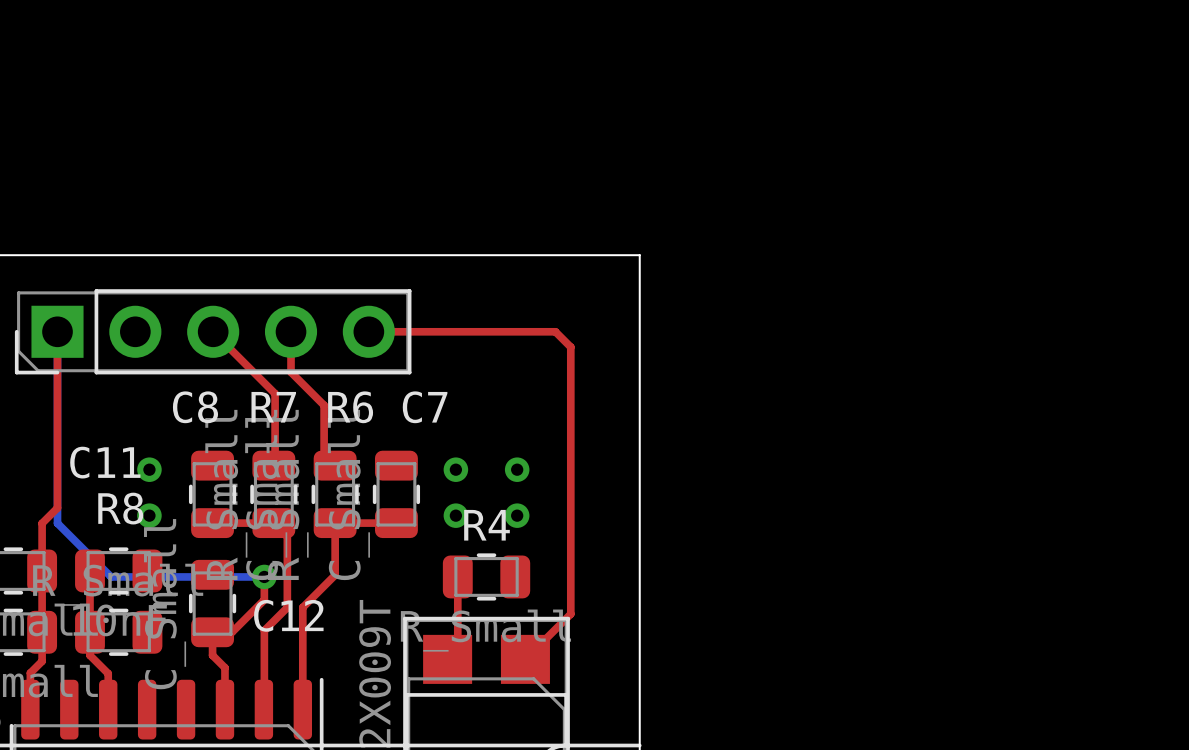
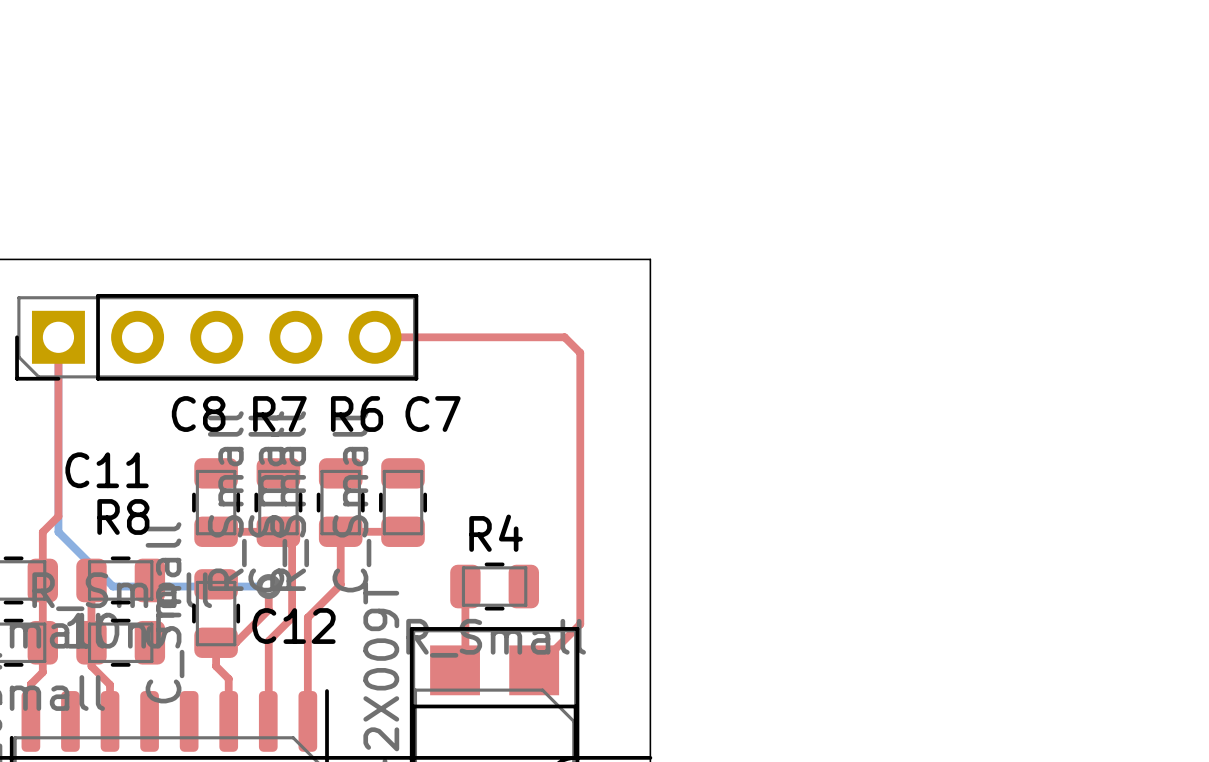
top track: (213, 331) (275, 393) (273, 465) -> none
top track: (291, 331) (291, 372) (324, 405) (324, 454) (335, 465) -> none
via: (149, 469) -> none
via: (455, 469) -> none
via: (517, 469) -> none
via: (149, 515) -> none
via: (455, 515) -> none
via: (517, 515) -> none

